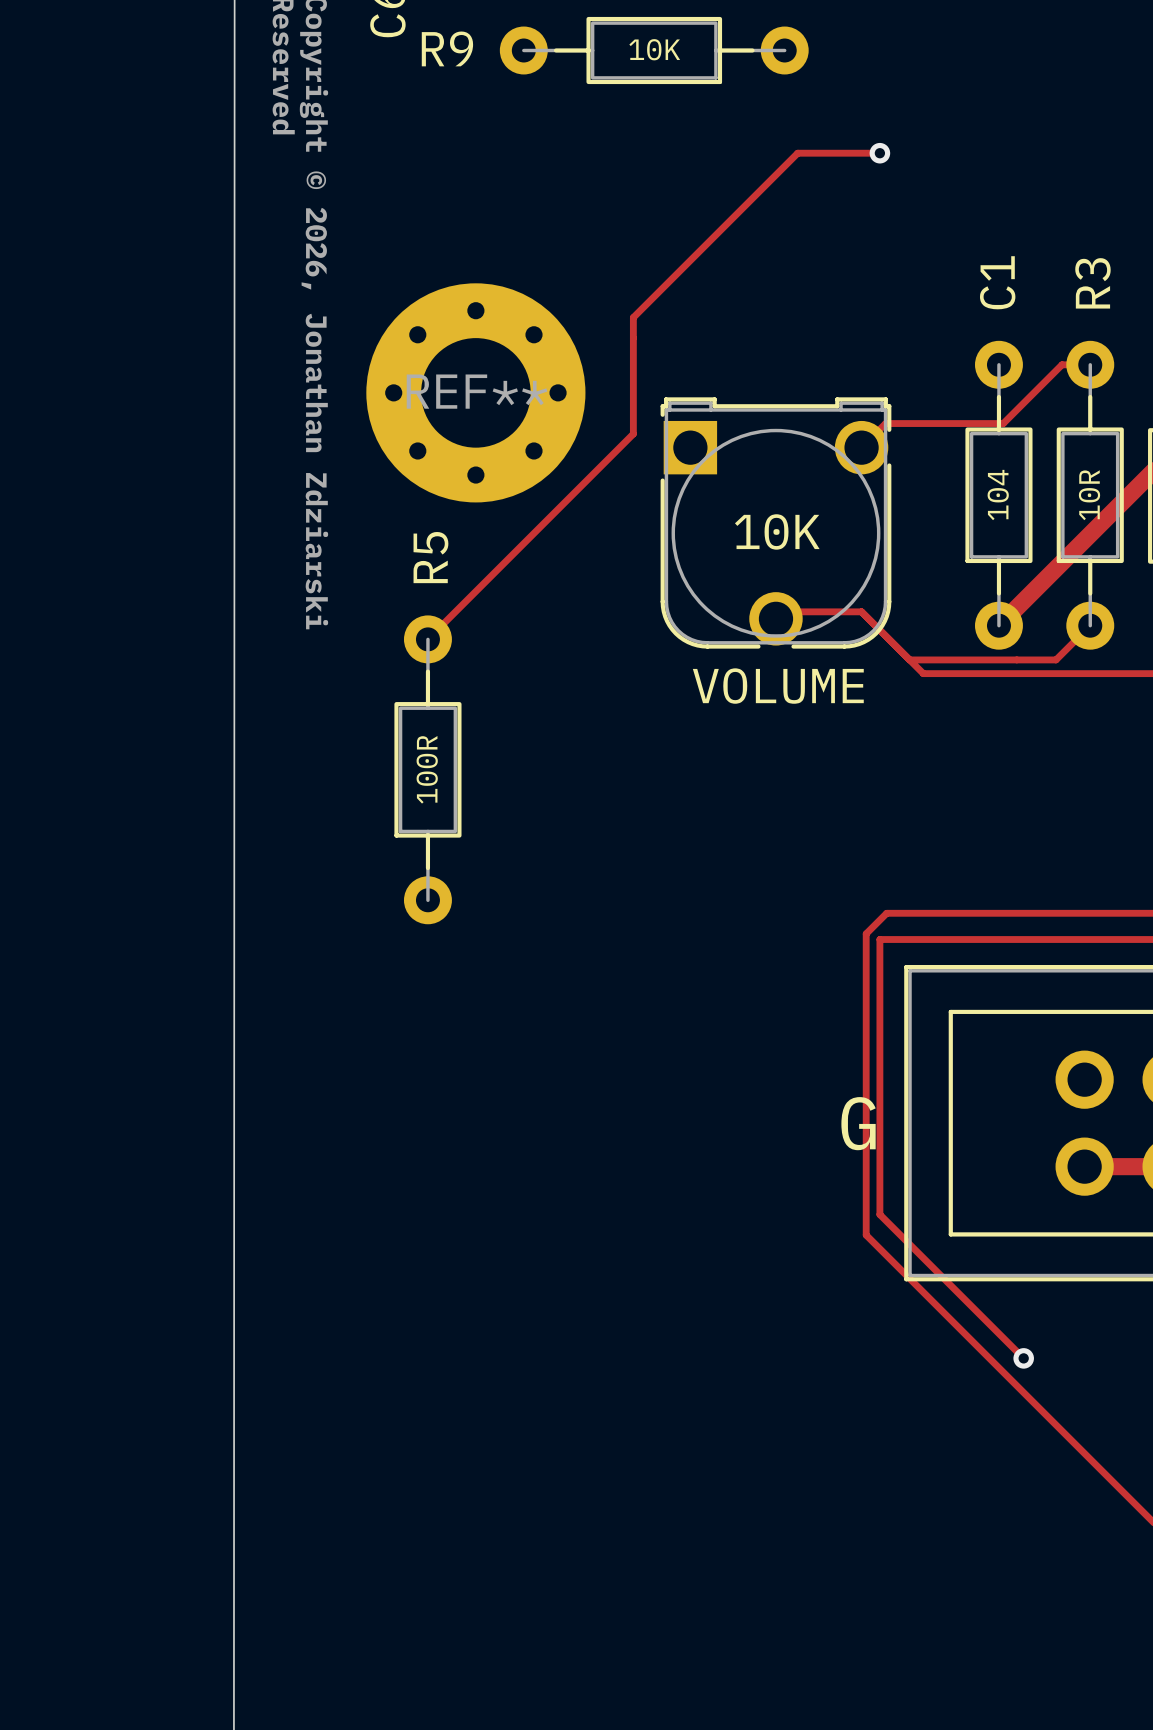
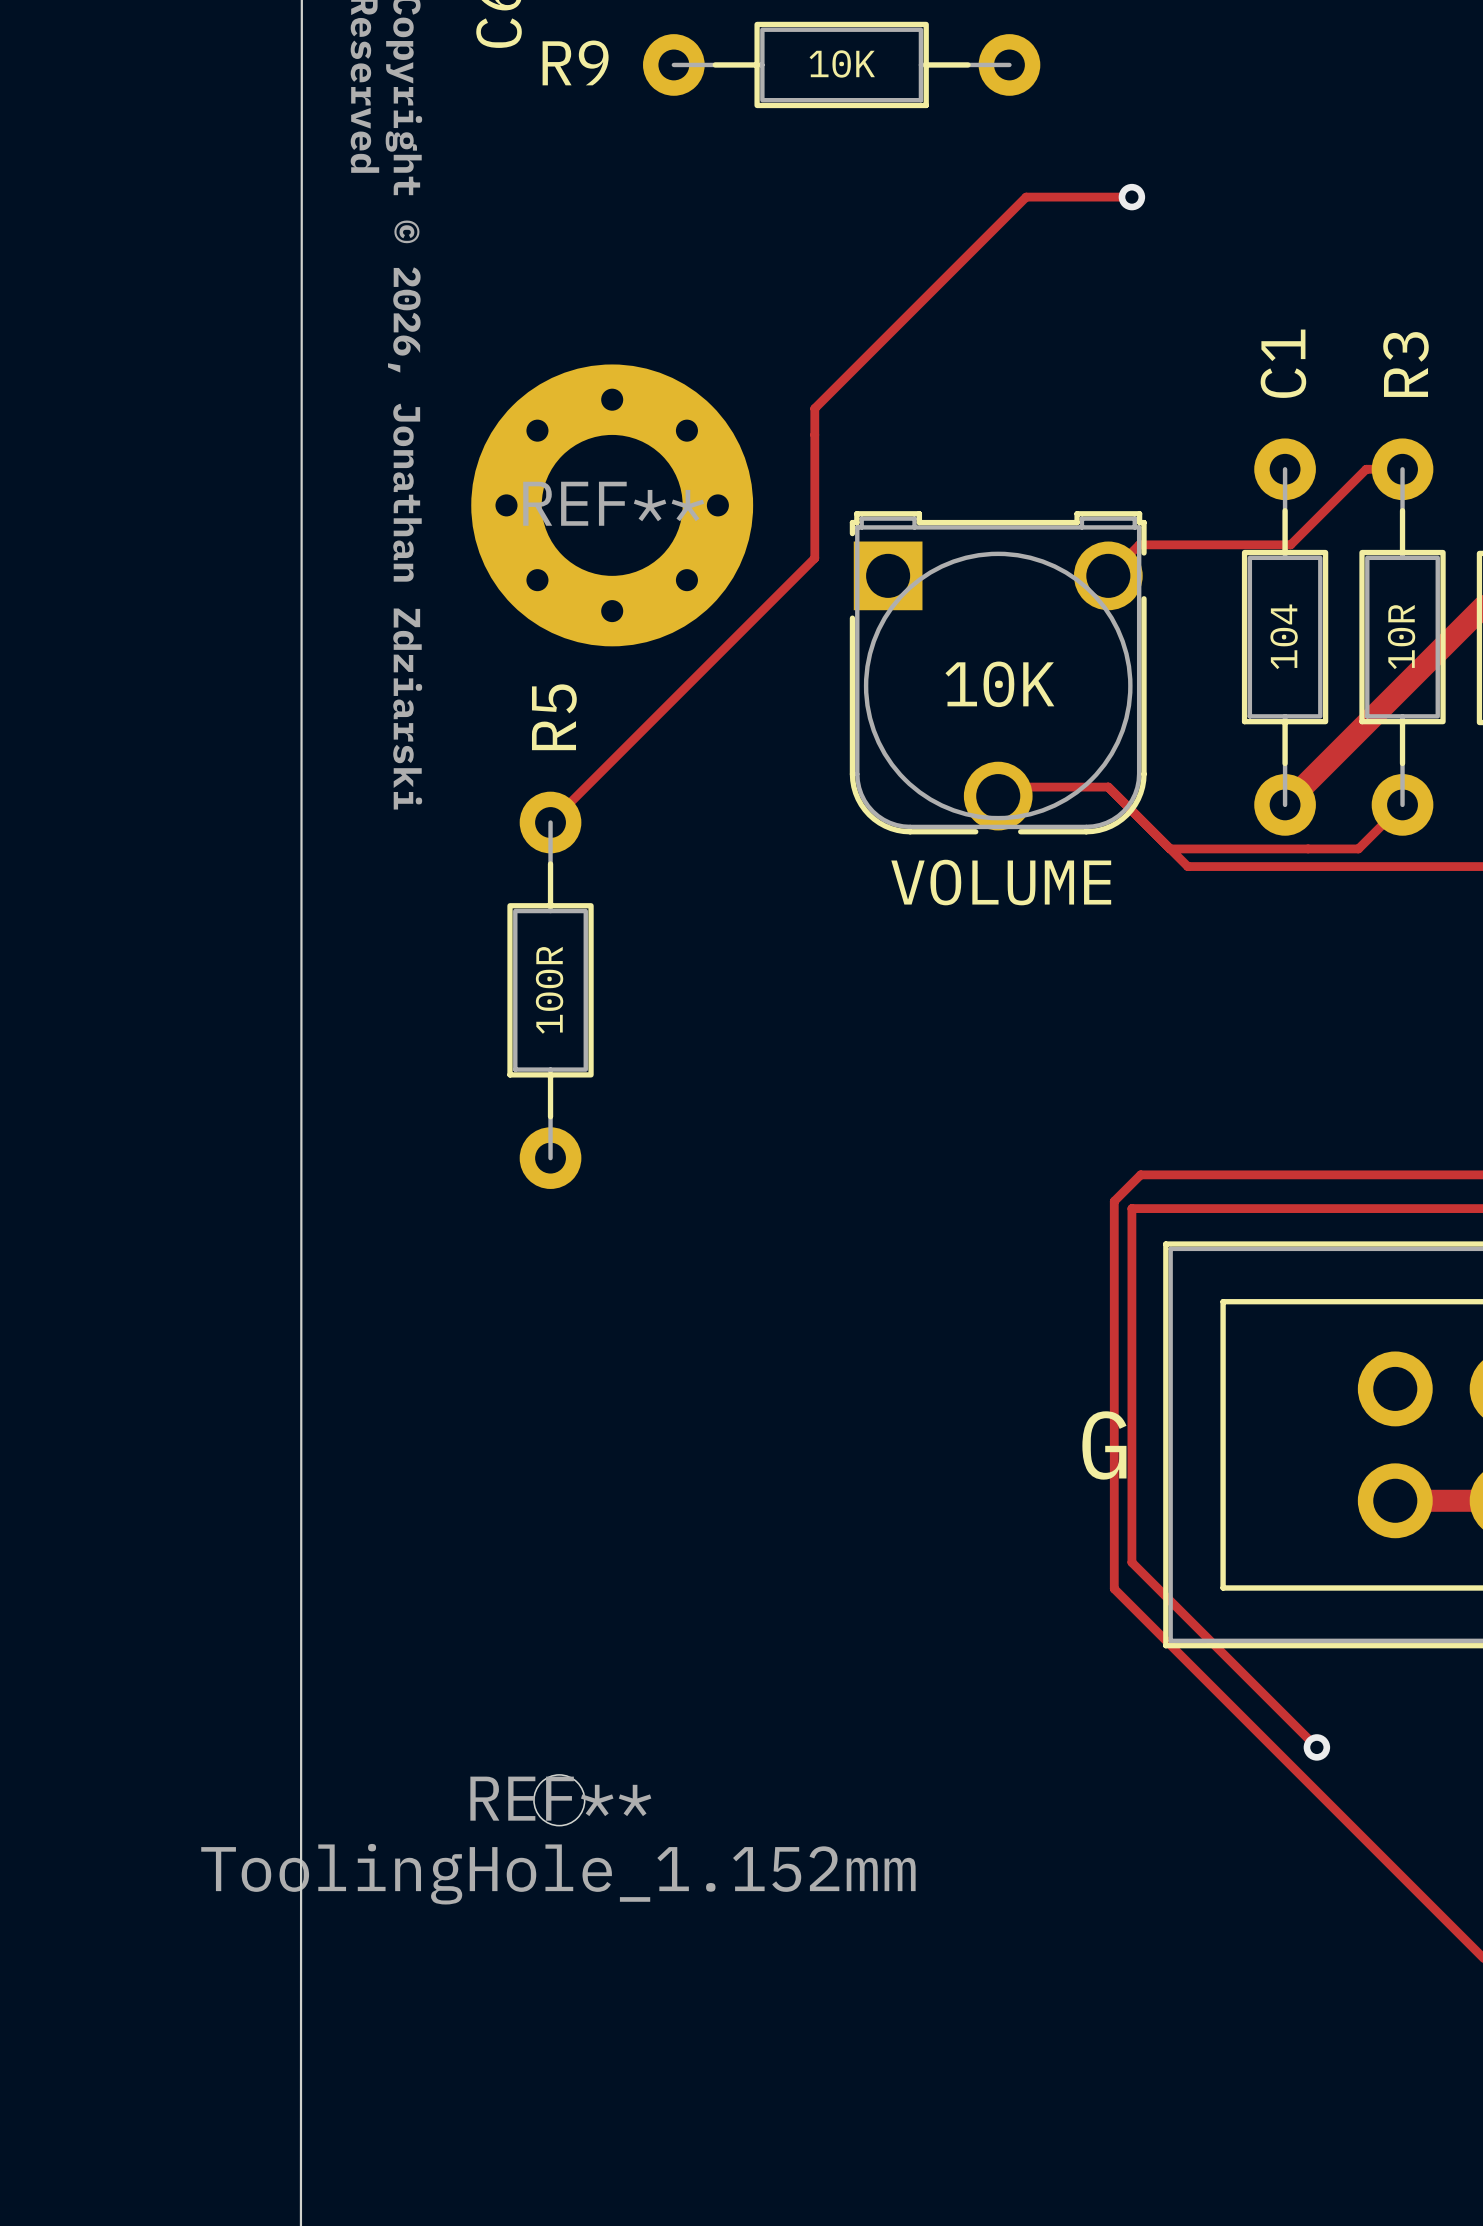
REF**: none -> ToolingHole_1.152mm (559, 1800)

